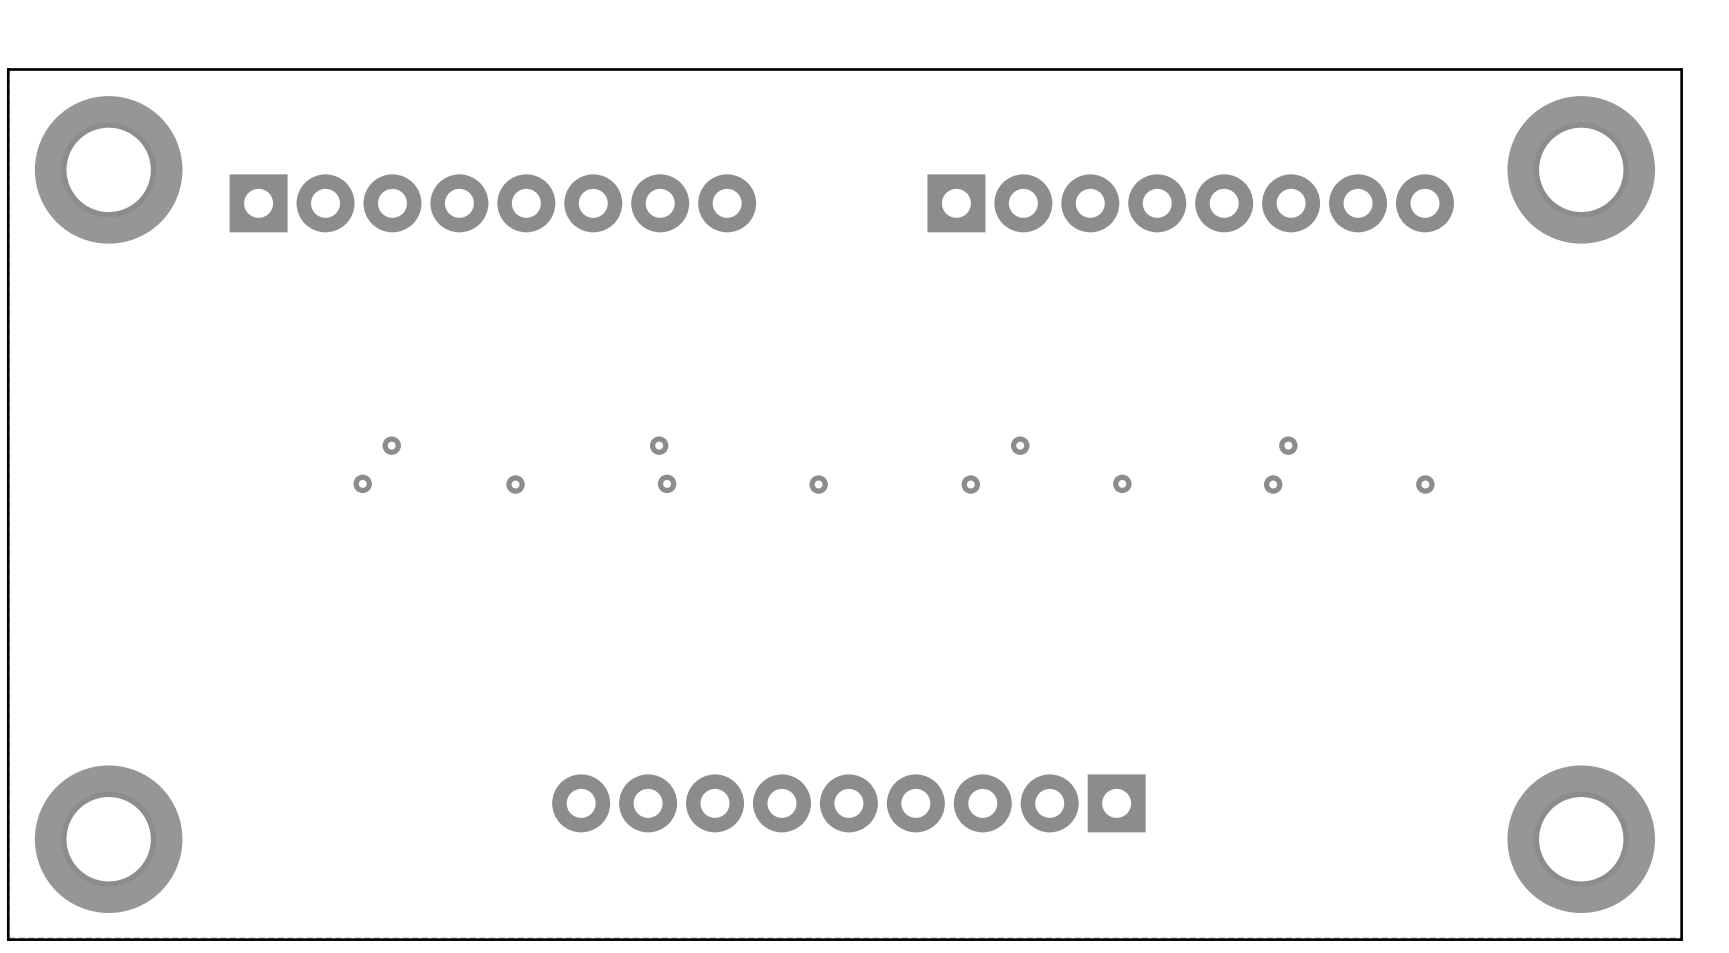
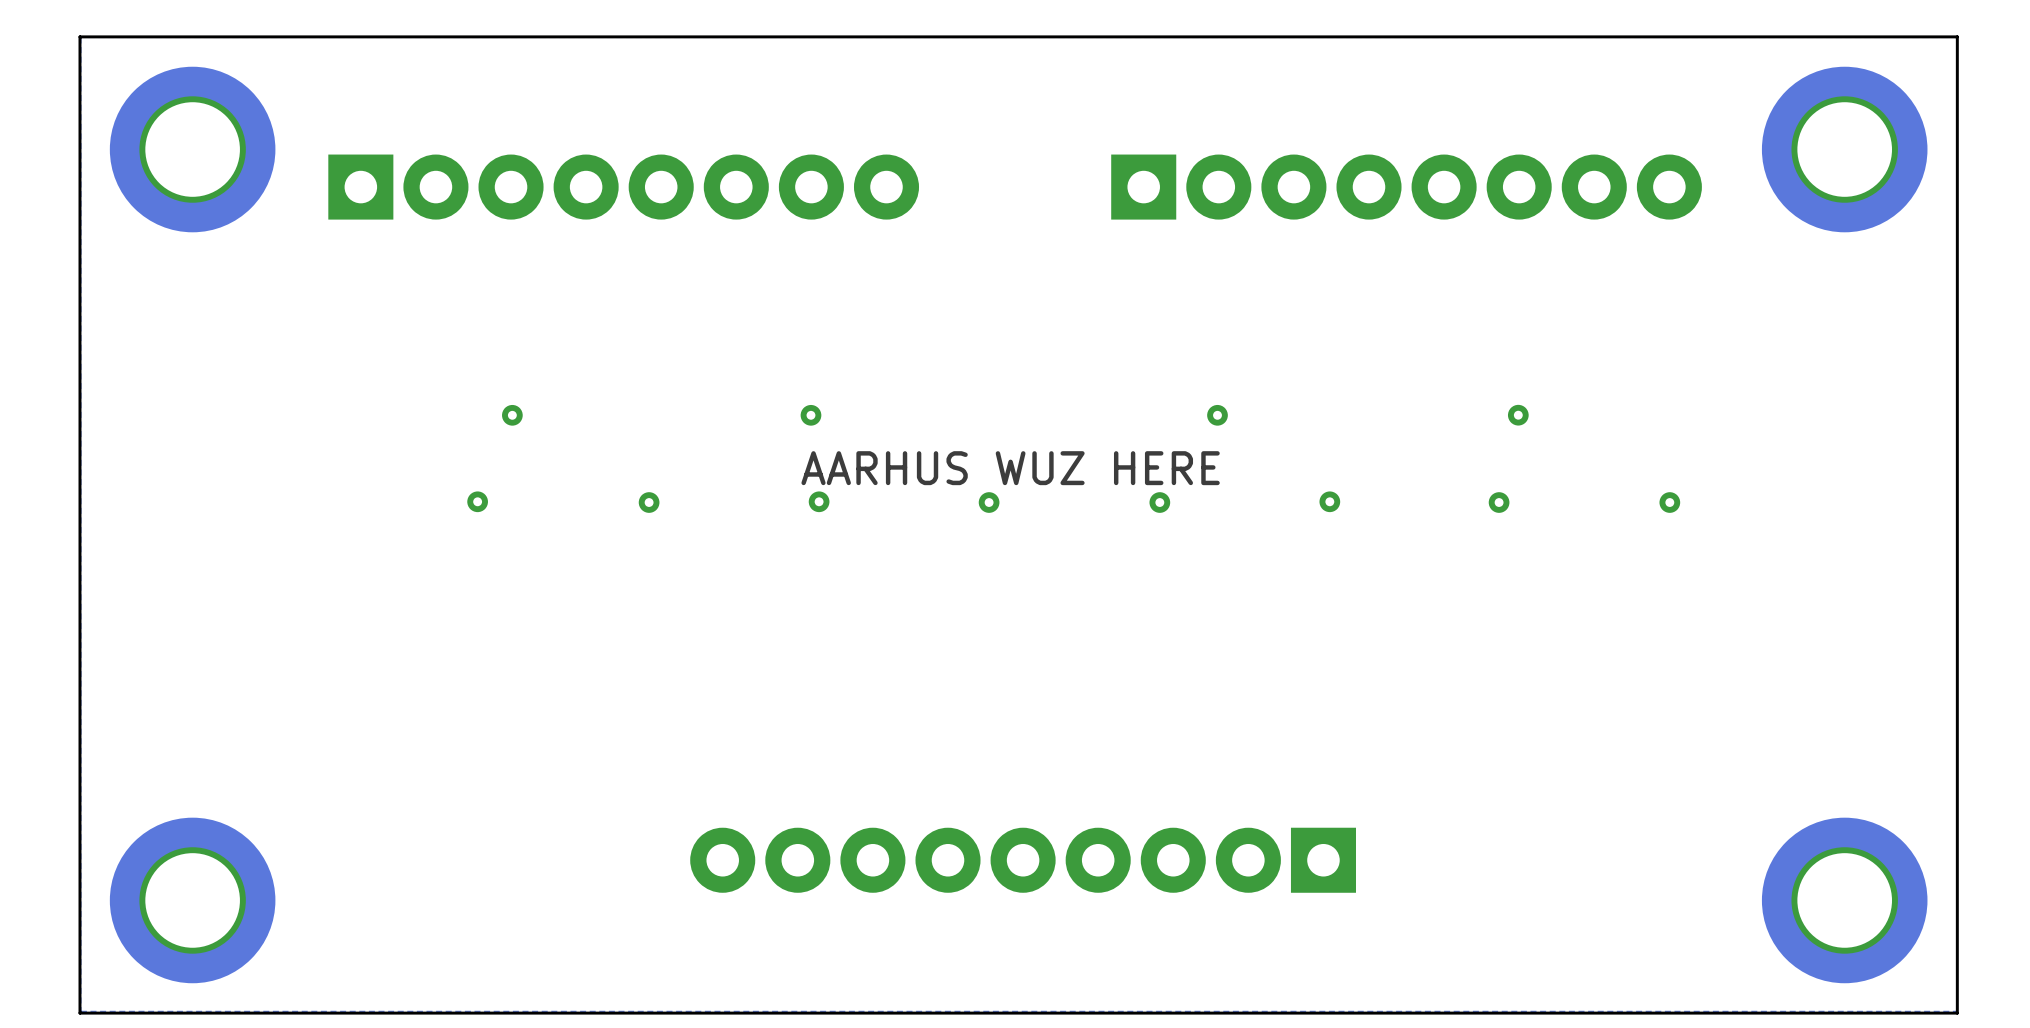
via position: (391, 445) -> (512, 415)
via position: (659, 445) -> (810, 415)
via position: (1020, 445) -> (1217, 415)
via position: (1288, 445) -> (1518, 415)
text: none -> AARHUS WUZ HERE (1010, 468)

